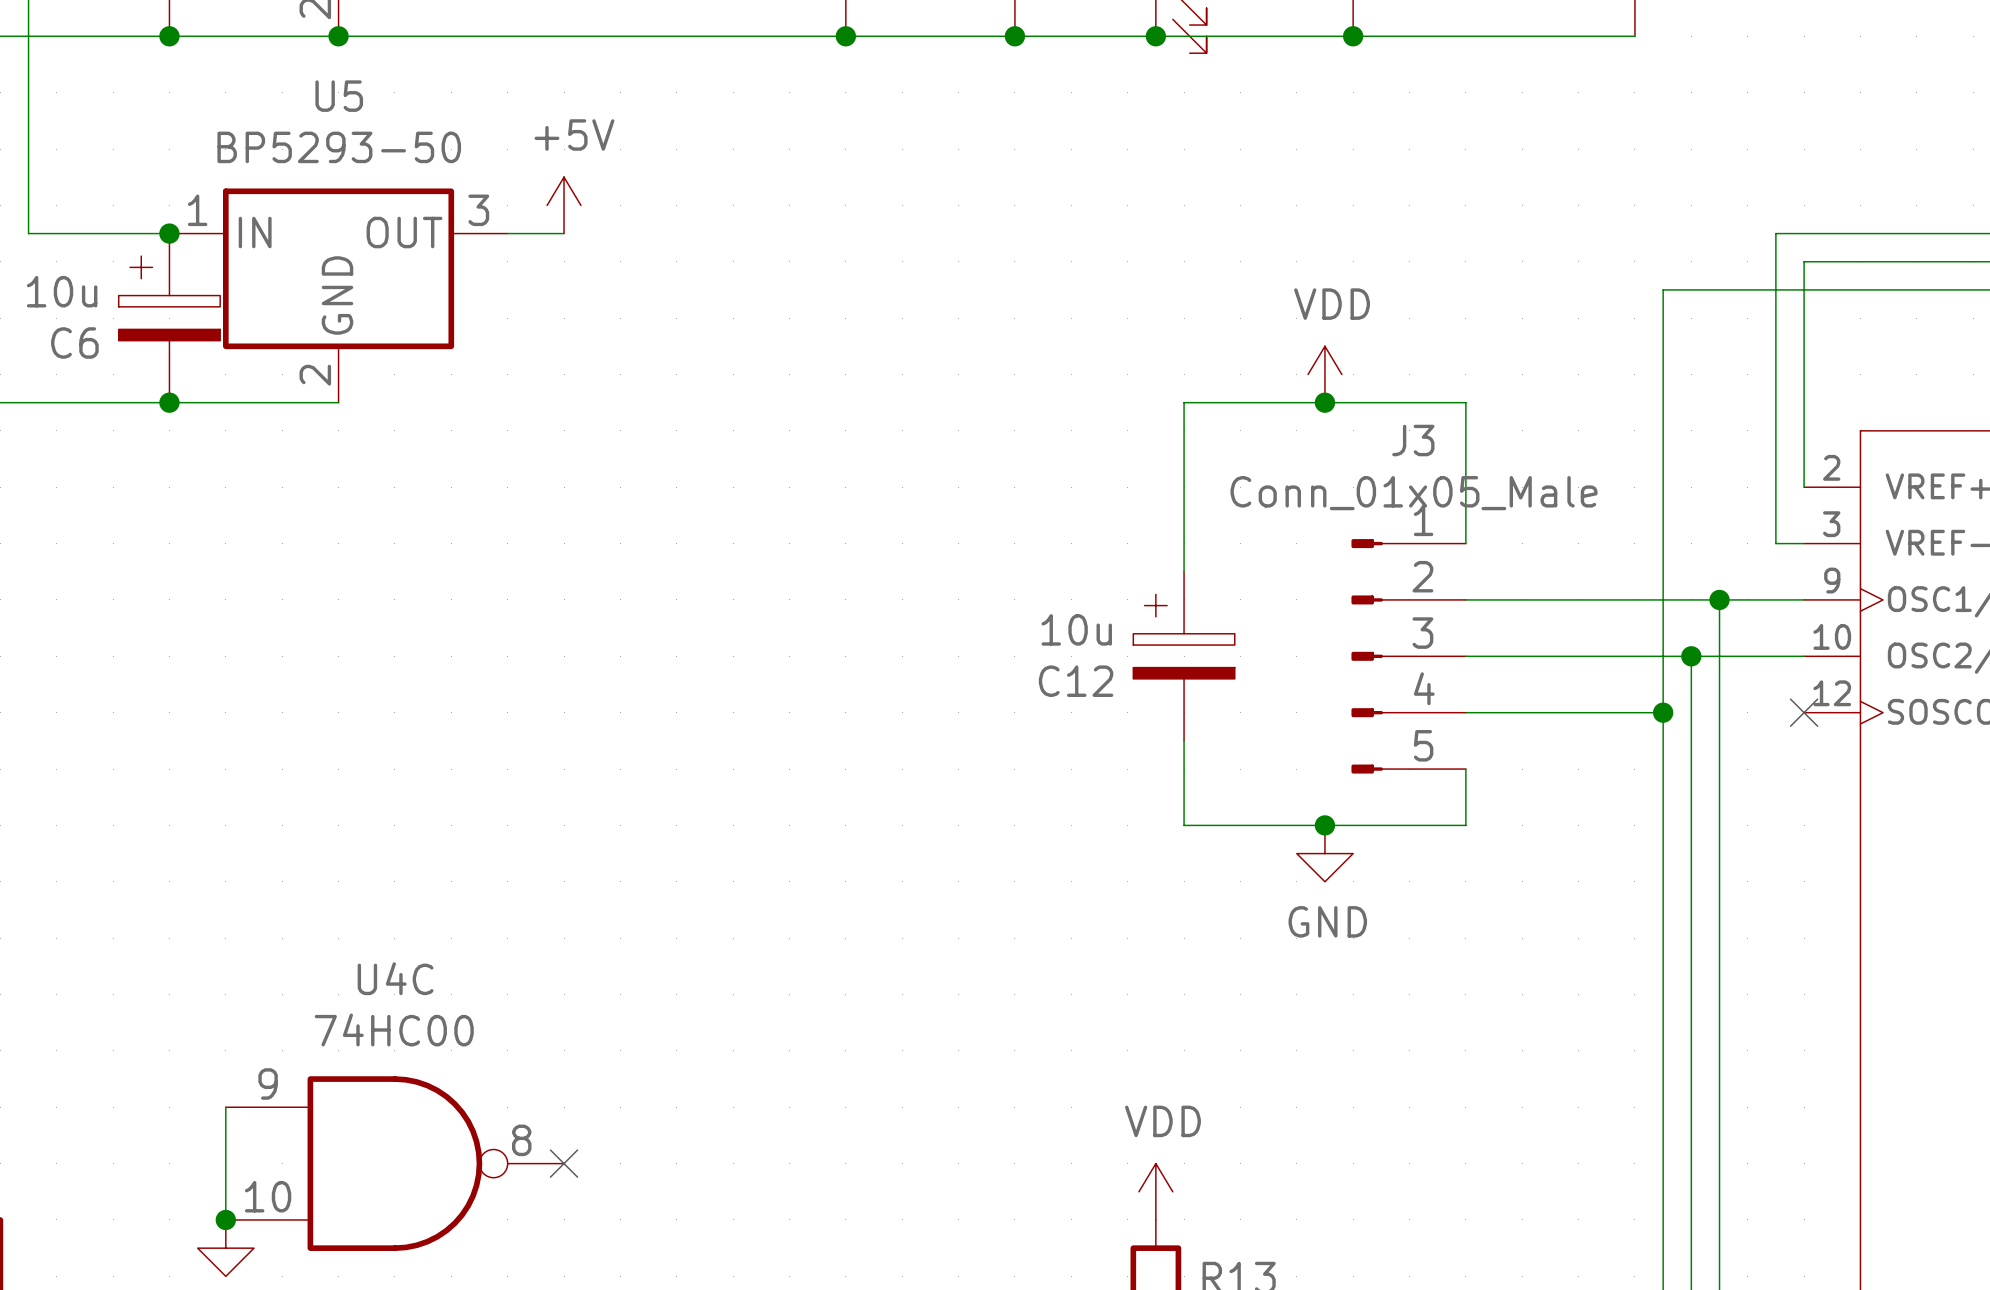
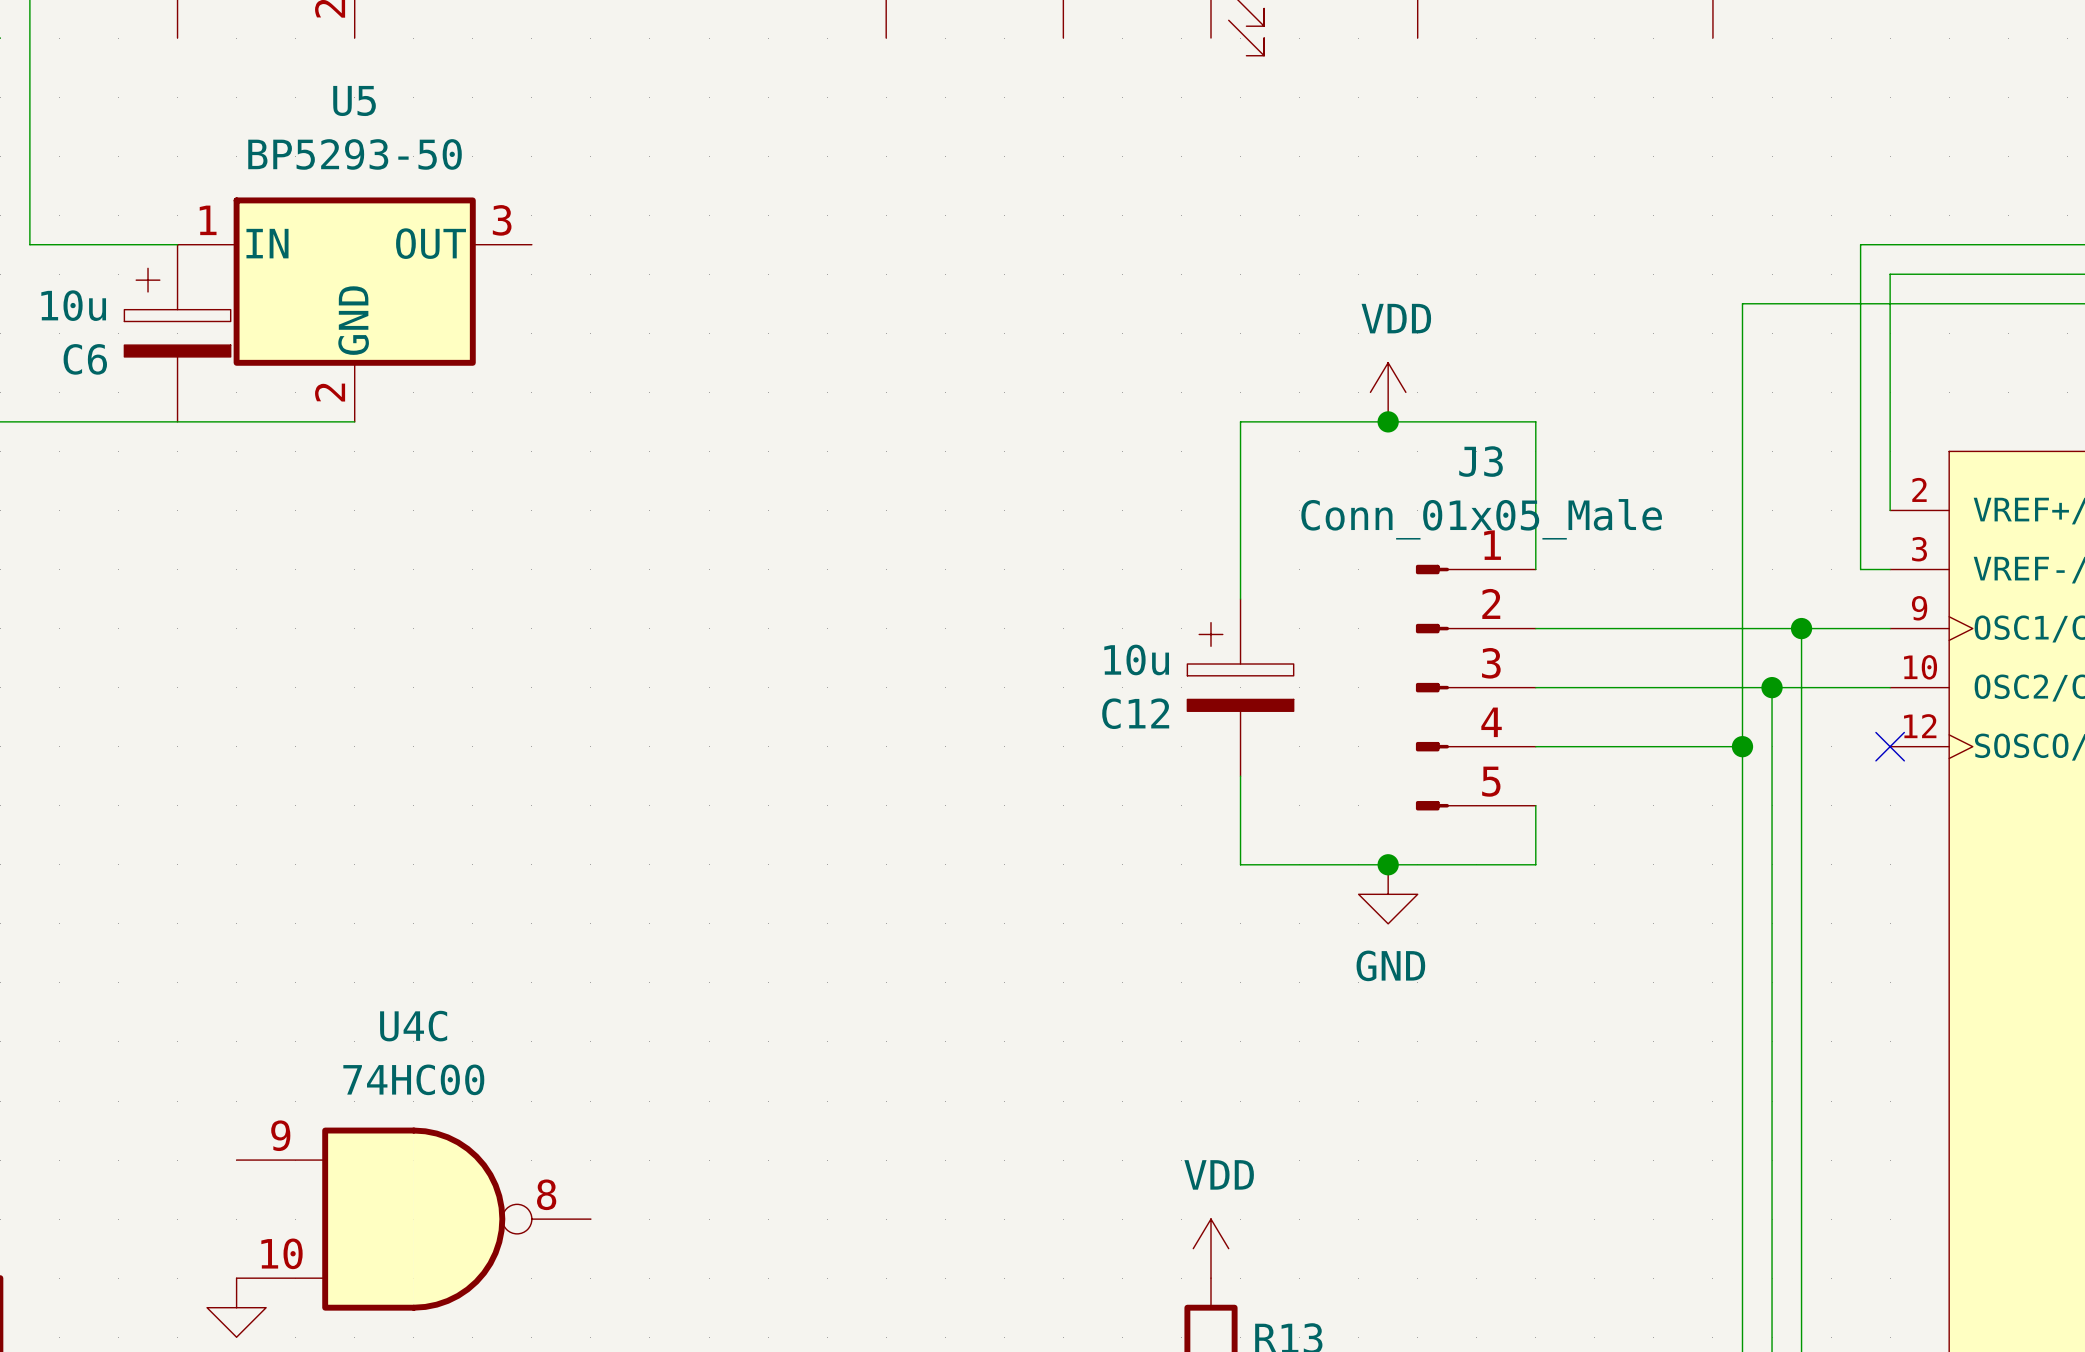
wire: (0, 36) (1634, 36) -> none
junction: (169, 36) -> none
junction: (338, 36) -> none
junction: (845, 36) -> none
junction: (1014, 36) -> none
junction: (1155, 36) -> none
junction: (1353, 36) -> none
power symbol: +5V (564, 205) -> none
junction: (169, 233) -> none
wire: (507, 233) (564, 233) -> none
junction: (169, 402) -> none
wire: (225, 1107) (225, 1219) -> none
no-connect mark: (564, 1163) -> none
junction: (225, 1219) -> none

